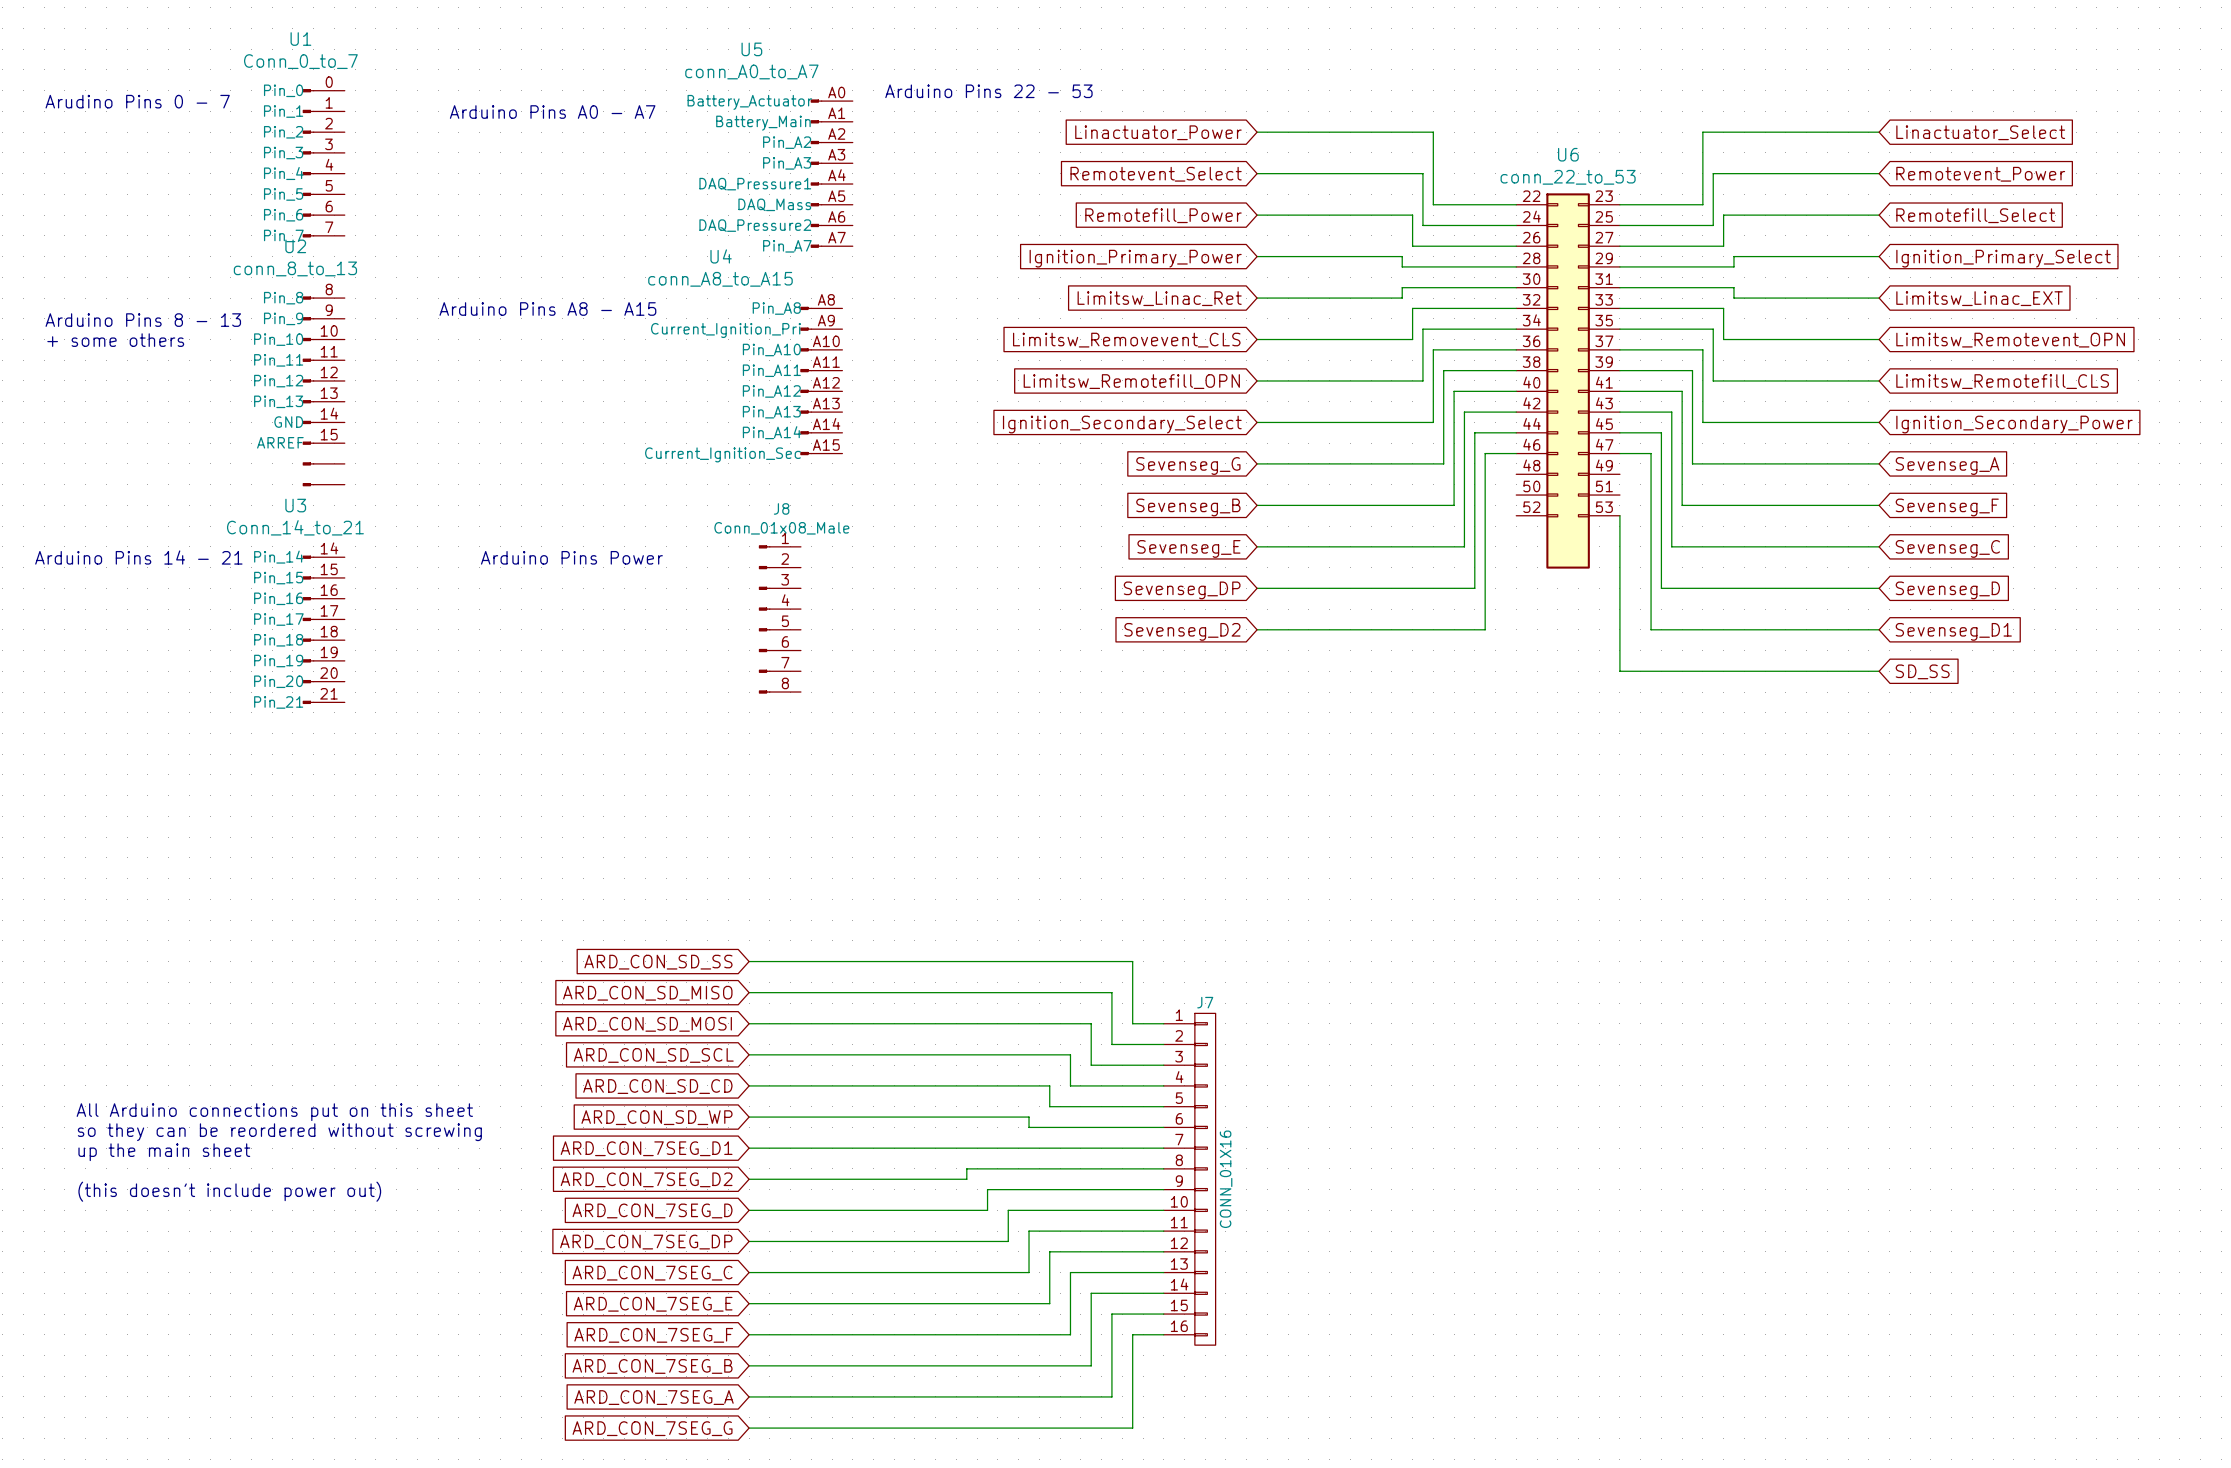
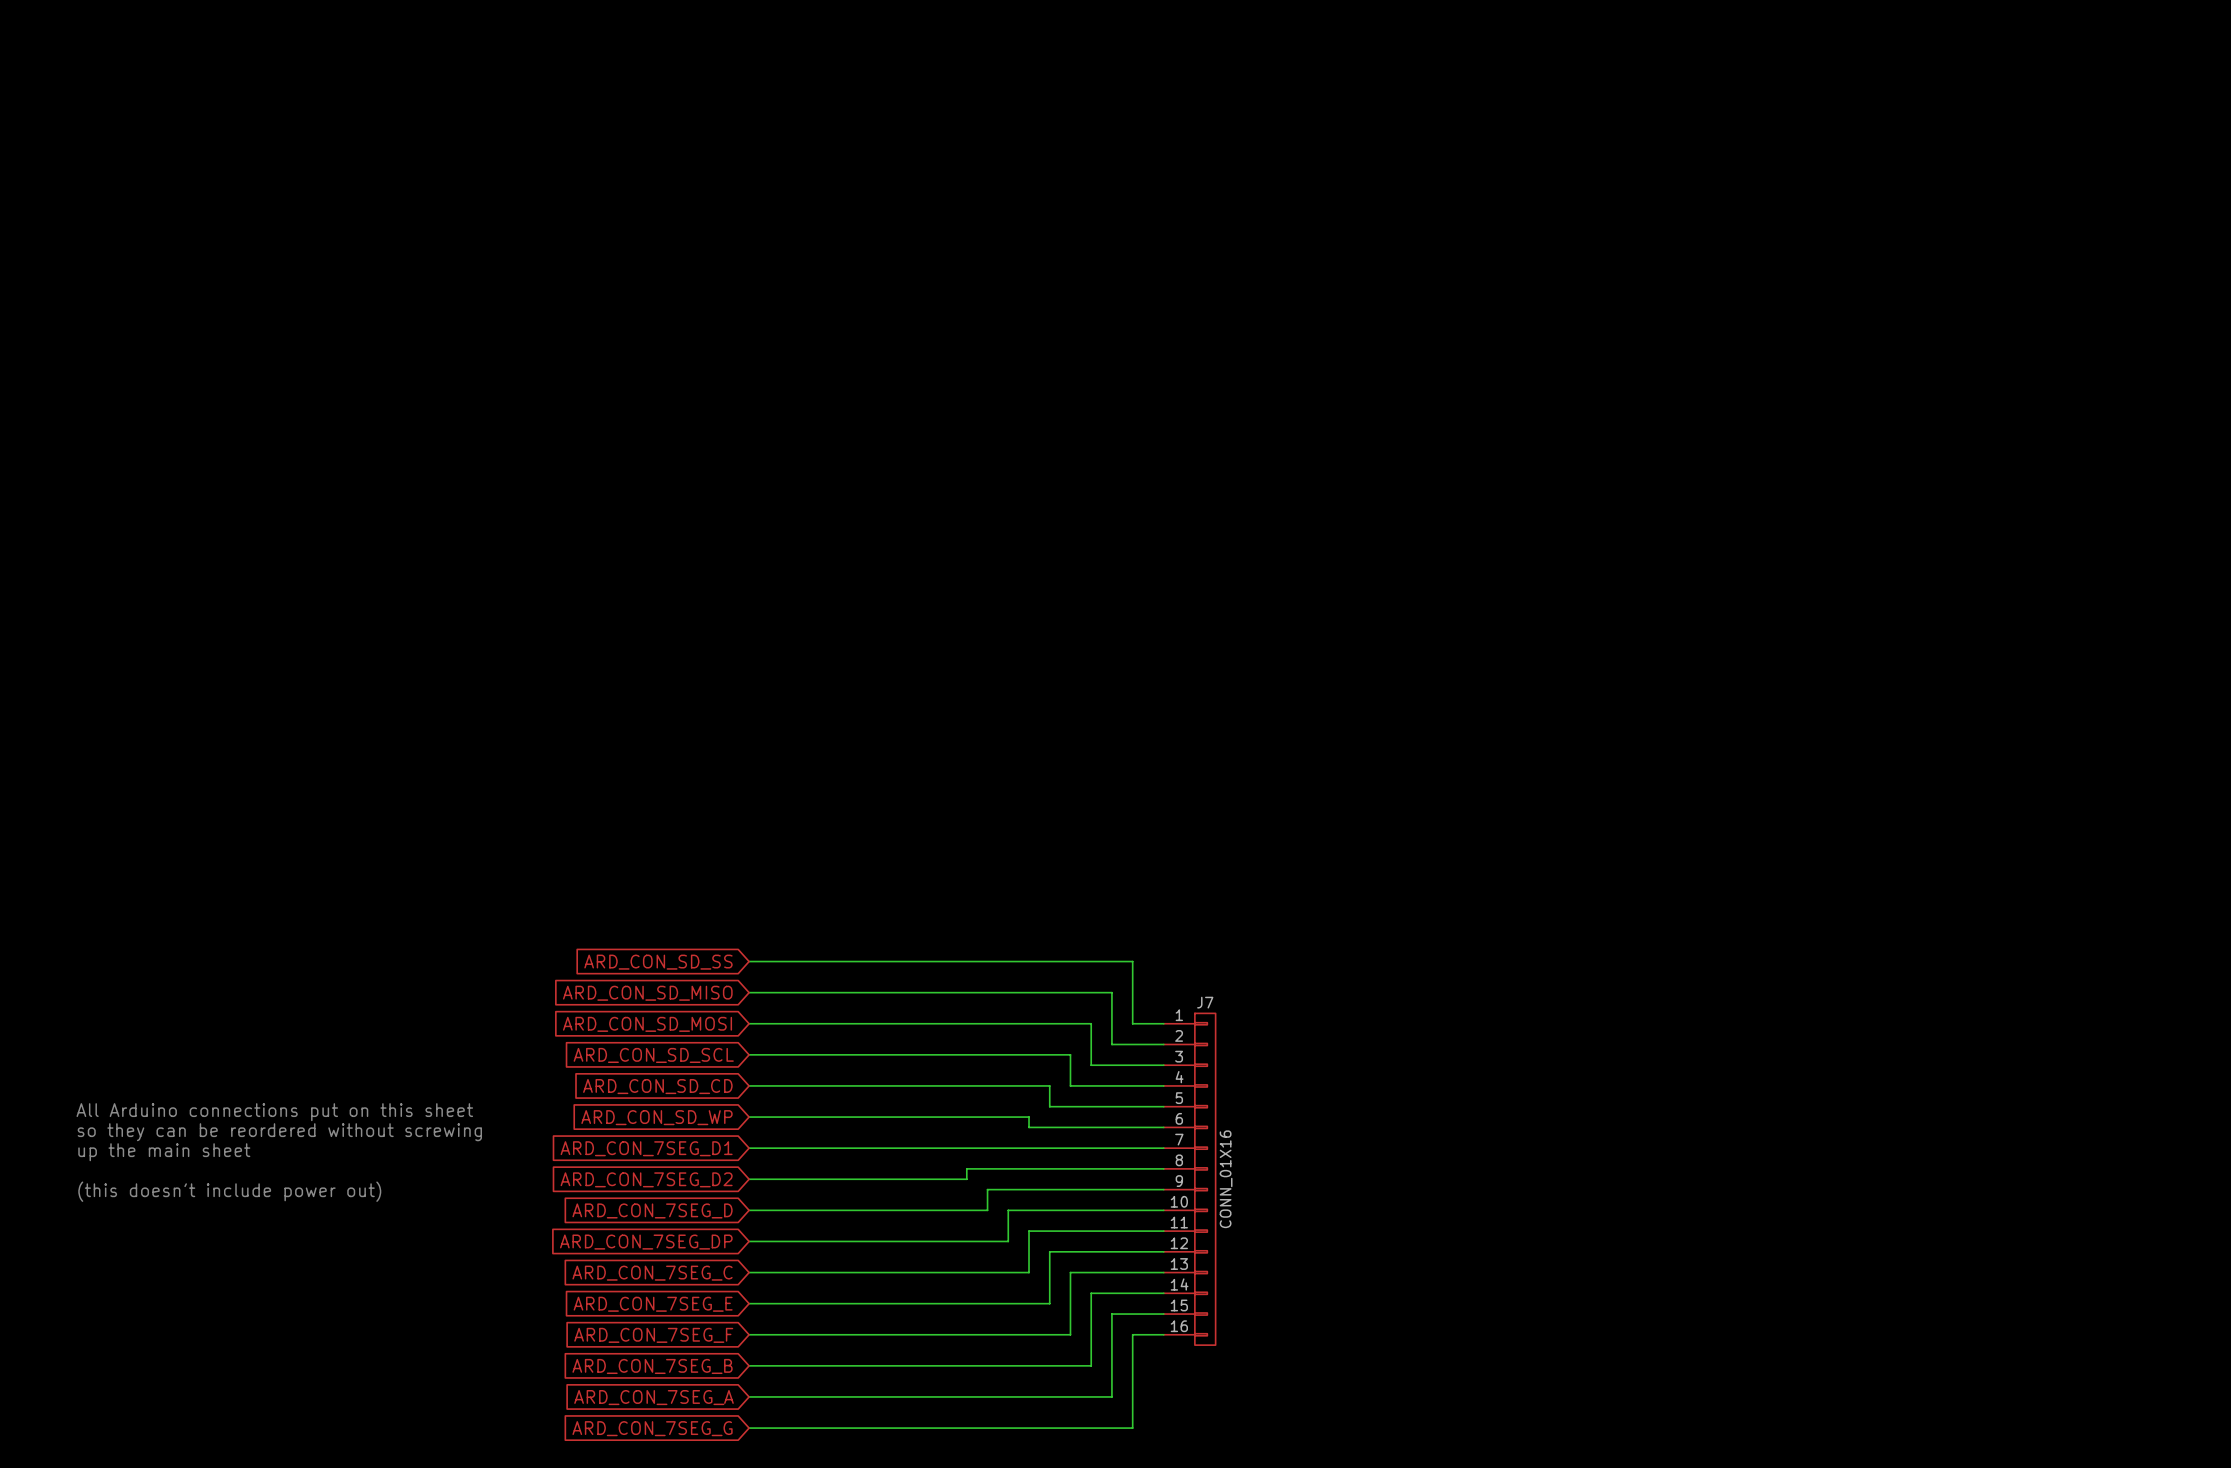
text: Arduino Pins 22 - 53 (988, 91) -> none
text: Arudino Pins 0 - 7 (137, 101) -> none
text: Arduino Pins A0 - A7 (552, 112) -> none
global label: Linactuator_Power (1158, 132) -> none
wire: (1257, 132) (1433, 132) (1433, 204) (1516, 204) -> none
wire: (1879, 132) (1702, 132) (1702, 204) (1619, 204) -> none
global label: Linactuator_Select (1980, 132) -> none
U1: Conn_0_to_7 (323, 163) -> none
U5: conn_A0_to_A7 (831, 173) -> none
wire: (1257, 173) (1422, 173) (1422, 225) (1516, 225) -> none
wire: (1879, 173) (1713, 173) (1713, 225) (1619, 225) -> none
global label: Remotevent_Select (1156, 174) -> none
global label: Remotevent_Power (1980, 174) -> none
global label: Remotefill_Power (1163, 215) -> none
wire: (1257, 215) (1412, 215) (1412, 246) (1516, 246) -> none
wire: (1879, 215) (1723, 215) (1723, 246) (1619, 246) -> none
global label: Remotefill_Select (1975, 215) -> none
wire: (1257, 256) (1402, 256) (1402, 266) (1516, 266) -> none
wire: (1879, 256) (1733, 256) (1733, 266) (1619, 266) -> none
global label: Ignition_Primary_Power (1135, 258) -> none
global label: Ignition_Primary_Select (2003, 258) -> none
wire: (1516, 287) (1402, 287) (1402, 298) (1257, 298) -> none
wire: (1619, 287) (1733, 287) (1733, 298) (1879, 298) -> none
global label: Limitsw_Linac_Ret (1159, 298) -> none
global label: Limitsw_Linac_EXT (1979, 298) -> none
wire: (1516, 308) (1412, 308) (1412, 339) (1257, 339) -> none
wire: (1619, 308) (1723, 308) (1723, 339) (1879, 339) -> none
text: Arduino Pins A8 - A15 (547, 309) -> none
text: Arduino Pins 8 - 13 (143, 320) -> none
wire: (1516, 329) (1422, 329) (1422, 380) (1257, 380) -> none
wire: (1619, 329) (1713, 329) (1713, 380) (1879, 380) -> none
text: + some others (115, 340) -> none
global label: Limitsw_Removevent_CLS (1126, 340) -> none
global label: Limitsw_Remotevent_OPN (2010, 340) -> none
wire: (1516, 349) (1433, 349) (1433, 422) (1257, 422) -> none
wire: (1619, 349) (1702, 349) (1702, 422) (1879, 422) -> none
wire: (1516, 370) (1443, 370) (1443, 463) (1257, 463) -> none
wire: (1619, 370) (1692, 370) (1692, 463) (1879, 463) -> none
U4: conn_A8_to_A15 (821, 380) -> none
U6: conn_22_to_53 (1568, 380) -> none
global label: Limitsw_Remotefill_OPN (1131, 381) -> none
global label: Limitsw_Remotefill_CLS (2002, 381) -> none
U2: conn_8_to_13 (323, 391) -> none
wire: (1516, 391) (1454, 391) (1454, 505) (1257, 505) -> none
wire: (1619, 391) (1682, 391) (1682, 505) (1879, 505) -> none
wire: (1516, 412) (1464, 412) (1464, 546) (1257, 546) -> none
wire: (1619, 412) (1671, 412) (1671, 546) (1879, 546) -> none
global label: Ignition_Secondary_Select (1122, 424) -> none
global label: Ignition_Secondary_Power (2014, 424) -> none
wire: (1516, 432) (1474, 432) (1474, 588) (1257, 588) -> none
wire: (1619, 432) (1661, 432) (1661, 588) (1879, 588) -> none
wire: (1516, 453) (1485, 453) (1485, 629) (1257, 629) -> none
wire: (1619, 453) (1651, 453) (1651, 629) (1879, 629) -> none
global label: Sevenseg_G (1188, 466) -> none
global label: Sevenseg_A (1947, 466) -> none
global label: Sevenseg_B (1188, 507) -> none
global label: Sevenseg_F (1947, 507) -> none
wire: (1619, 515) (1619, 671) (1879, 671) -> none
global label: Sevenseg_E (1188, 548) -> none
global label: Sevenseg_C (1947, 548) -> none
text: Arduino Pins 14 - 21 (138, 557) -> none
text: Arduino Pins Power (571, 557) -> none
global label: Sevenseg_DP (1182, 590) -> none
global label: Sevenseg_D (1947, 590) -> none
J8: Conn_01x08_Male (779, 619) -> none
U3: Conn_14_to_21 (323, 629) -> none
global label: Sevenseg_D2 (1182, 631) -> none
global label: Sevenseg_D1 (1953, 631) -> none
global label: SD_SS (1922, 671) -> none

